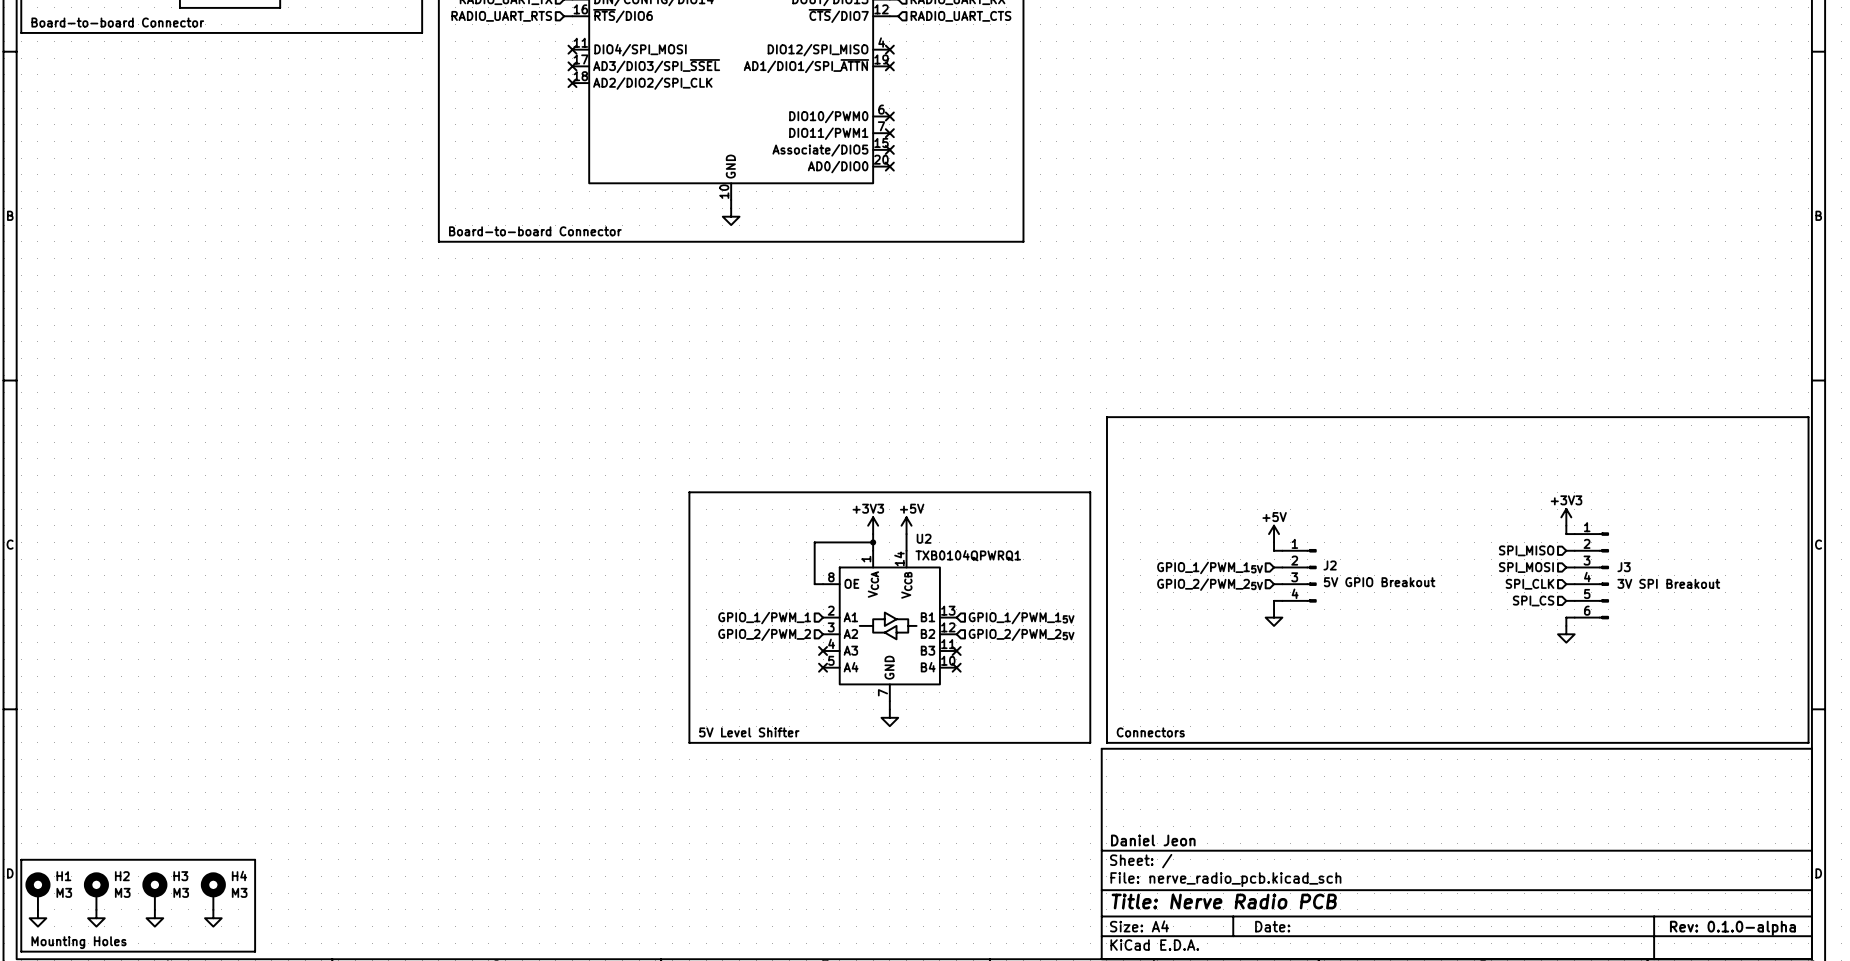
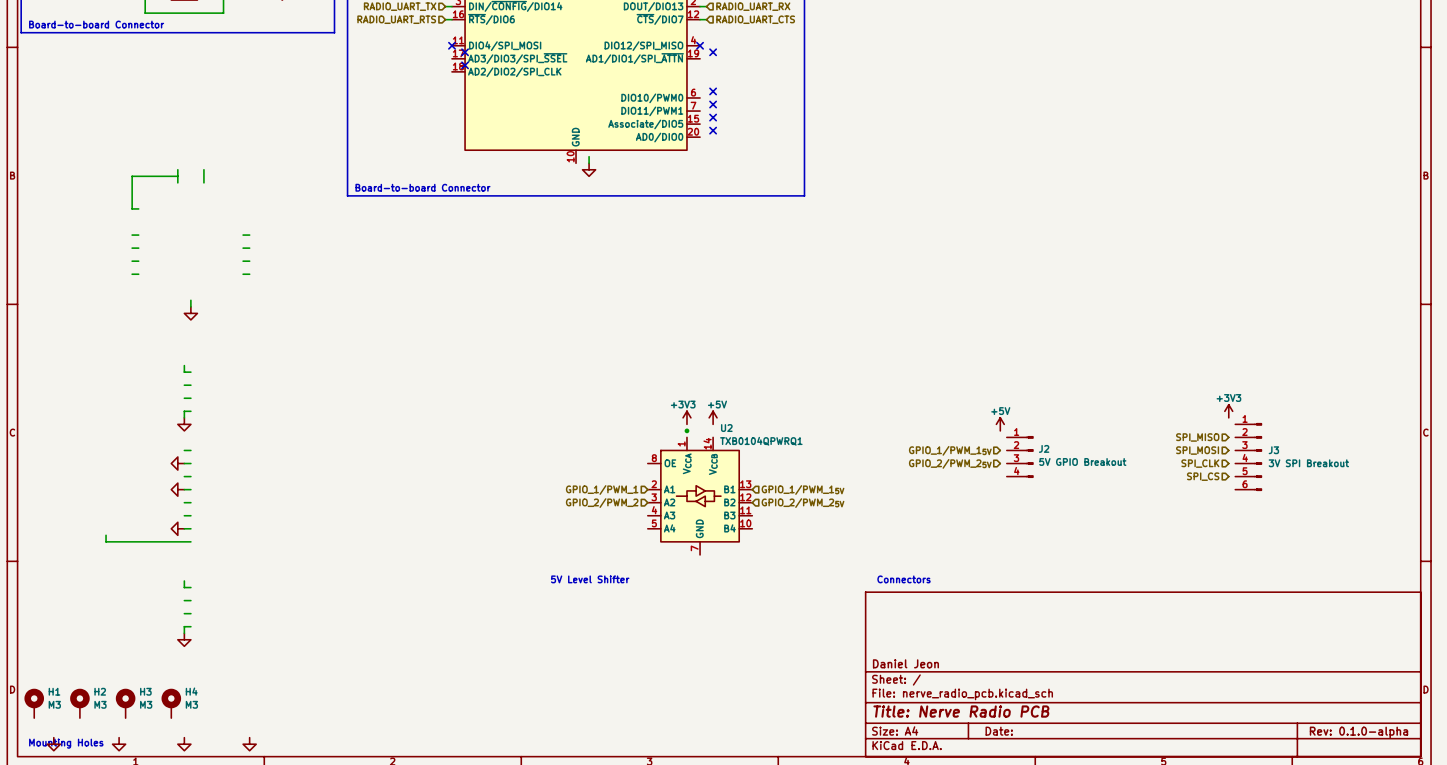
no-connect mark: none -> (465, 52)
no-connect mark: (572, 66) -> none
no-connect mark position: (889, 66) -> (713, 52)
no-connect mark: none -> (465, 65)
no-connect mark: (572, 83) -> none
no-connect mark: none -> (713, 91)
no-connect mark: (889, 116) -> none
no-connect mark: none -> (713, 104)
no-connect mark: (889, 133) -> none
no-connect mark: none -> (713, 117)
no-connect mark: (889, 149) -> none
no-connect mark: none -> (713, 130)
no-connect mark: (889, 166) -> none
wire: (731, 200) (731, 208) -> (589, 156) (589, 163)
wire: none -> (177, 169) (177, 182)
wire: none -> (203, 169) (203, 182)
wire: none -> (177, 176) (132, 176) (132, 208) (138, 208)
power symbol position: (731, 216) -> (589, 169)
wire: none -> (132, 235) (138, 235)
wire: none -> (243, 235) (249, 235)
wire: none -> (132, 248) (138, 248)
wire: none -> (243, 248) (249, 248)
wire: none -> (132, 261) (138, 261)
wire: none -> (243, 261) (249, 261)
wire: none -> (132, 274) (138, 274)
wire: none -> (243, 274) (249, 274)
wire: none -> (190, 300) (190, 306)
power symbol: none -> (190, 313)
line: (1106, 417) (1808, 417) (1808, 742) (1106, 742) (1106, 417) -> none
wire: none -> (184, 365) (184, 372) (190, 372)
wire: none -> (184, 385) (190, 385)
line: (689, 492) (1090, 492) (1090, 742) (689, 742) (689, 492) -> none
wire: none -> (184, 398) (190, 398)
wire: none -> (190, 411) (184, 411) (184, 417)
wire: (1566, 525) (1566, 534) (1574, 534) -> none
power symbol: none -> (184, 424)
wire: (873, 534) (873, 550) -> none
wire: (906, 534) (906, 550) -> none
wire: (873, 542) (814, 542) (814, 584) (823, 584) -> none
wire: (1274, 542) (1274, 550) (1282, 550) -> none
wire: (1566, 550) (1574, 550) -> none
wire: none -> (184, 450) (190, 450)
wire: (1274, 567) (1282, 567) -> none
wire: (1566, 567) (1574, 567) -> none
power symbol: none -> (177, 463)
wire: none -> (184, 463) (190, 463)
wire: (1274, 584) (1282, 584) -> none
wire: (1566, 584) (1574, 584) -> none
wire: none -> (184, 476) (190, 476)
wire: (1282, 600) (1274, 600) (1274, 609) -> none
wire: (1566, 600) (1574, 600) -> none
power symbol: none -> (177, 489)
wire: none -> (184, 489) (190, 489)
power symbol: (1274, 617) -> none
wire: (1574, 617) (1566, 617) (1566, 625) -> none
wire: none -> (184, 502) (190, 502)
power symbol: (1566, 634) -> none
wire: none -> (184, 515) (190, 515)
no-connect mark: (823, 650) -> none
no-connect mark: (956, 650) -> none
power symbol: none -> (177, 528)
wire: none -> (184, 528) (190, 528)
no-connect mark: (823, 667) -> none
no-connect mark: (956, 667) -> none
wire: none -> (106, 535) (106, 541) (190, 541)
wire: (889, 701) (889, 709) -> none
power symbol: (889, 717) -> none
wire: none -> (184, 581) (184, 587) (190, 587)
wire: none -> (184, 600) (190, 600)
wire: none -> (184, 613) (190, 613)
wire: none -> (190, 626) (184, 626) (184, 633)
power symbol: none -> (184, 639)
line: (21, 859) (21, 951) (255, 951) (255, 859) (21, 859) -> none
power symbol: (37, 918) -> none
power symbol: (96, 918) -> none
power symbol position: (154, 918) -> (119, 744)
power symbol position: (213, 918) -> (184, 744)
power symbol: none -> (53, 744)
power symbol: none -> (249, 744)

